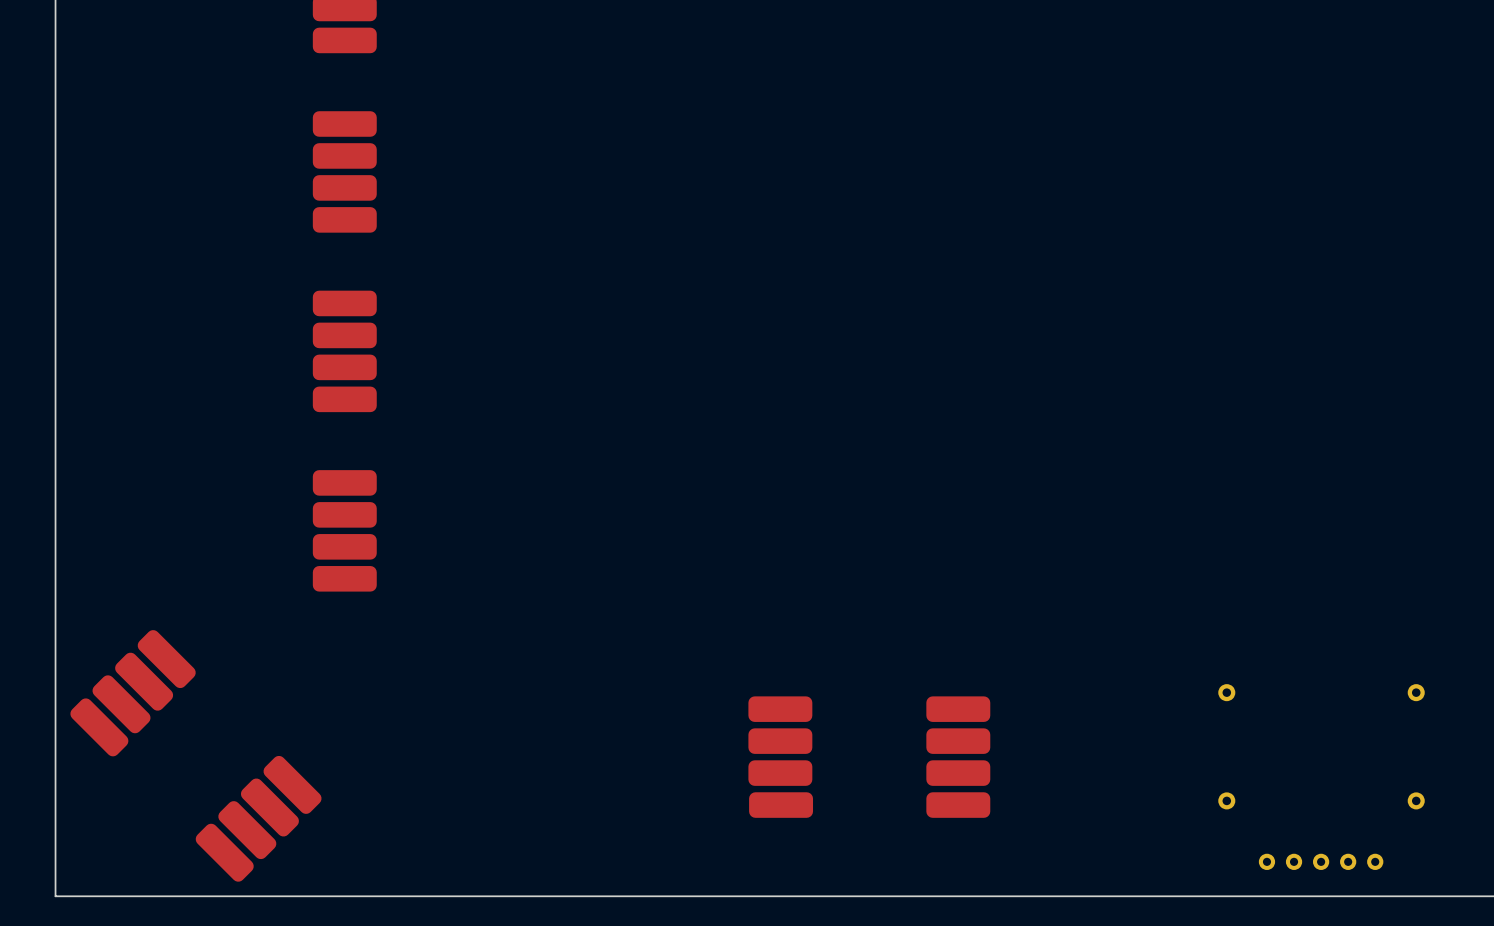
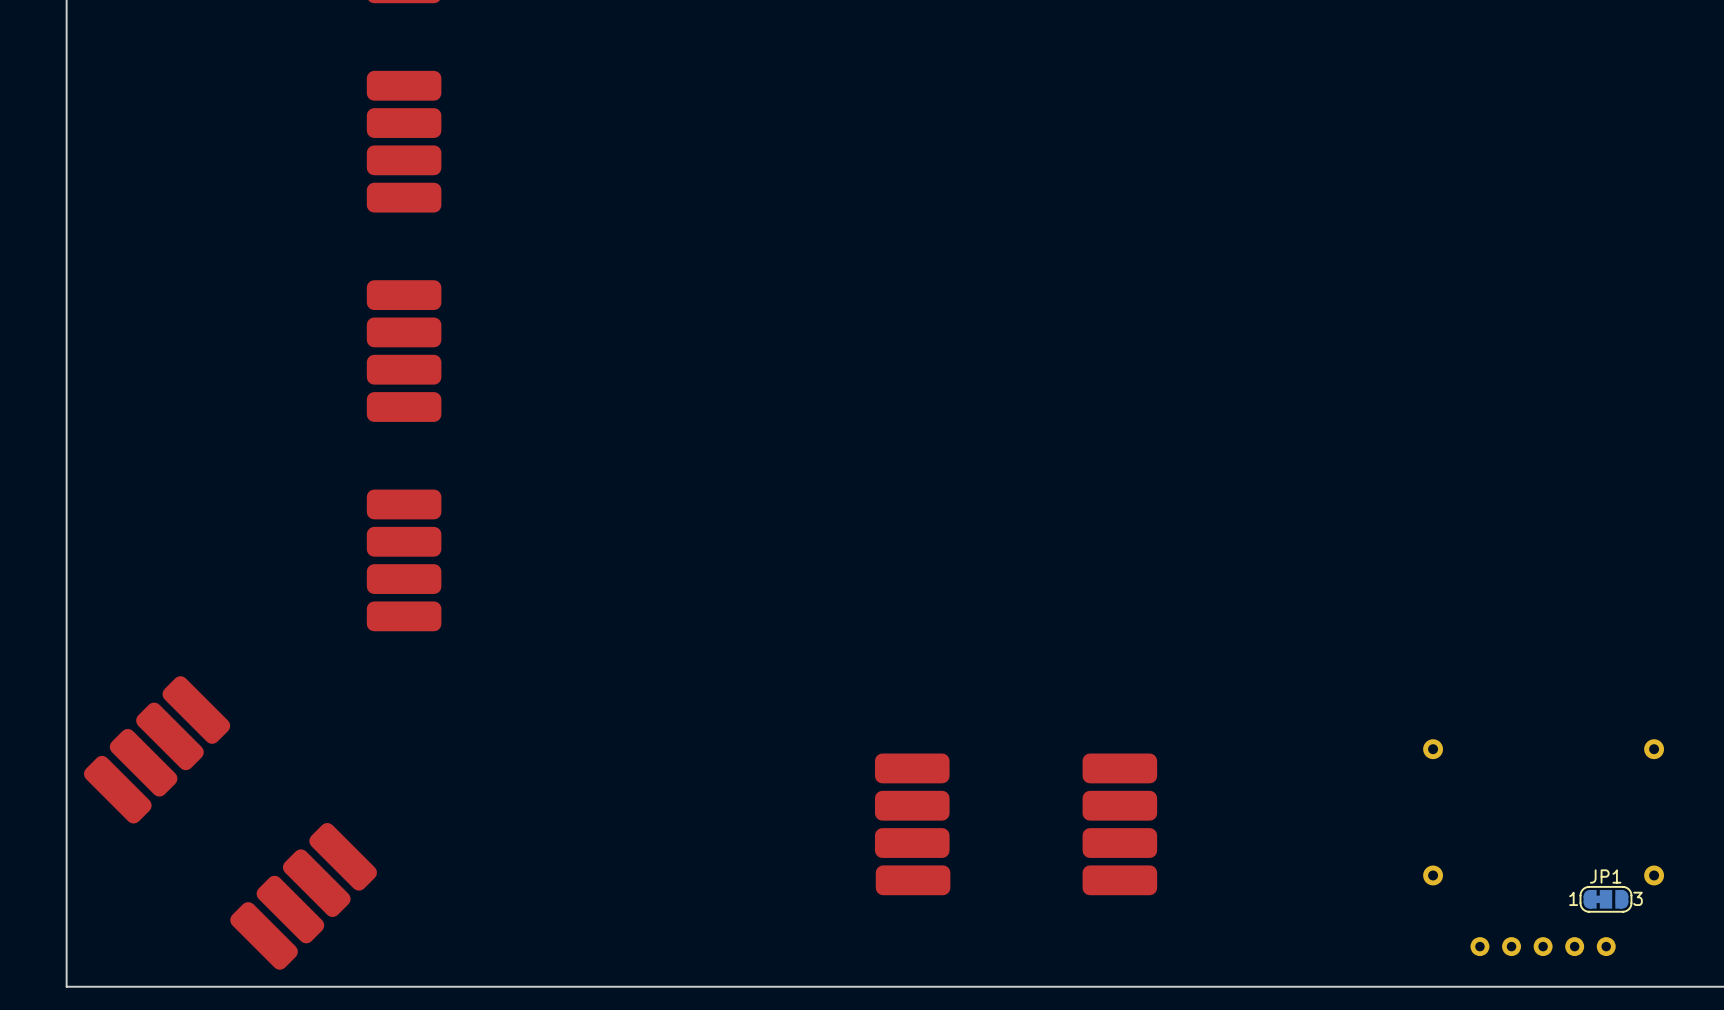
JP1: none -> (1605, 899)

